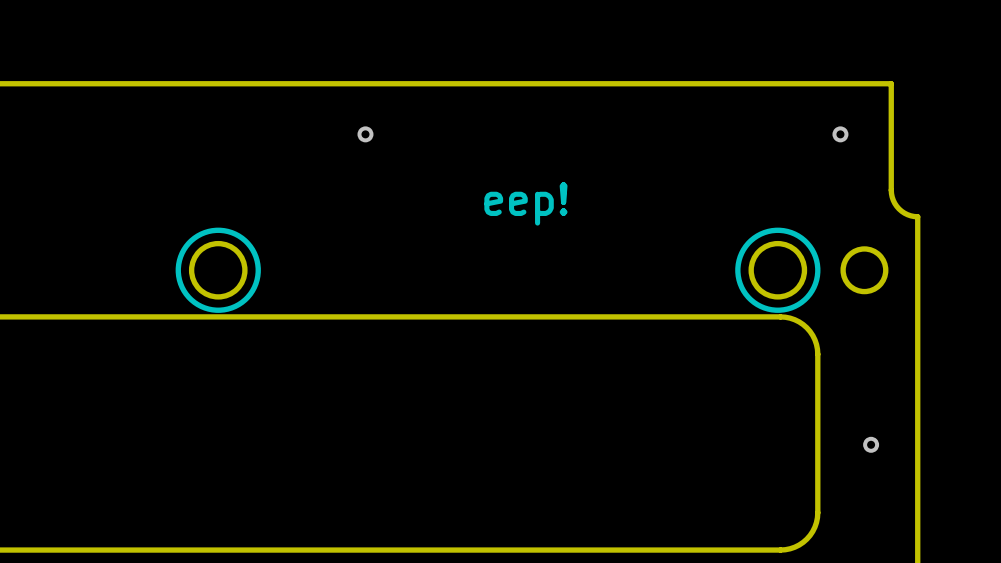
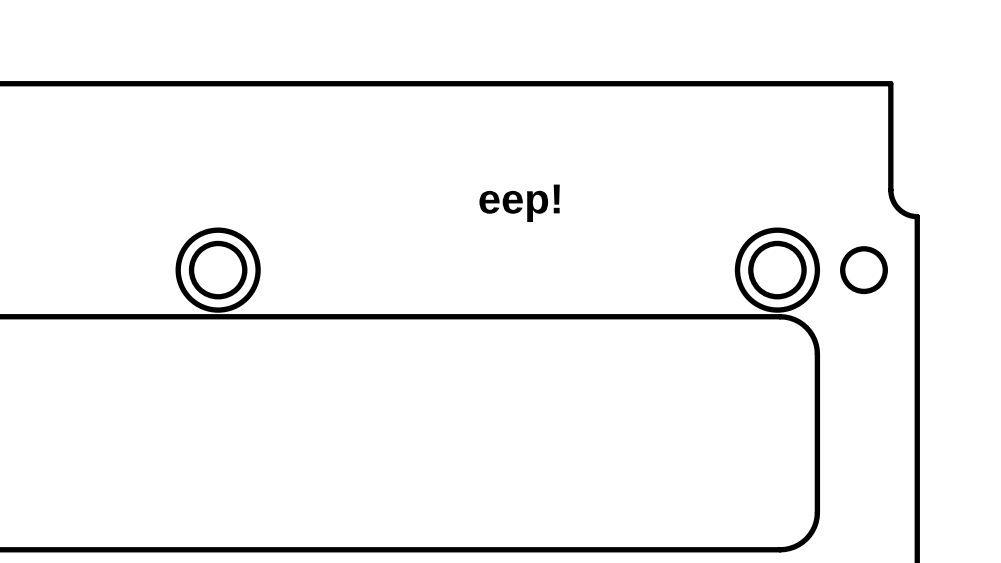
via: (365, 134) -> none
via: (840, 134) -> none
via: (871, 444) -> none

